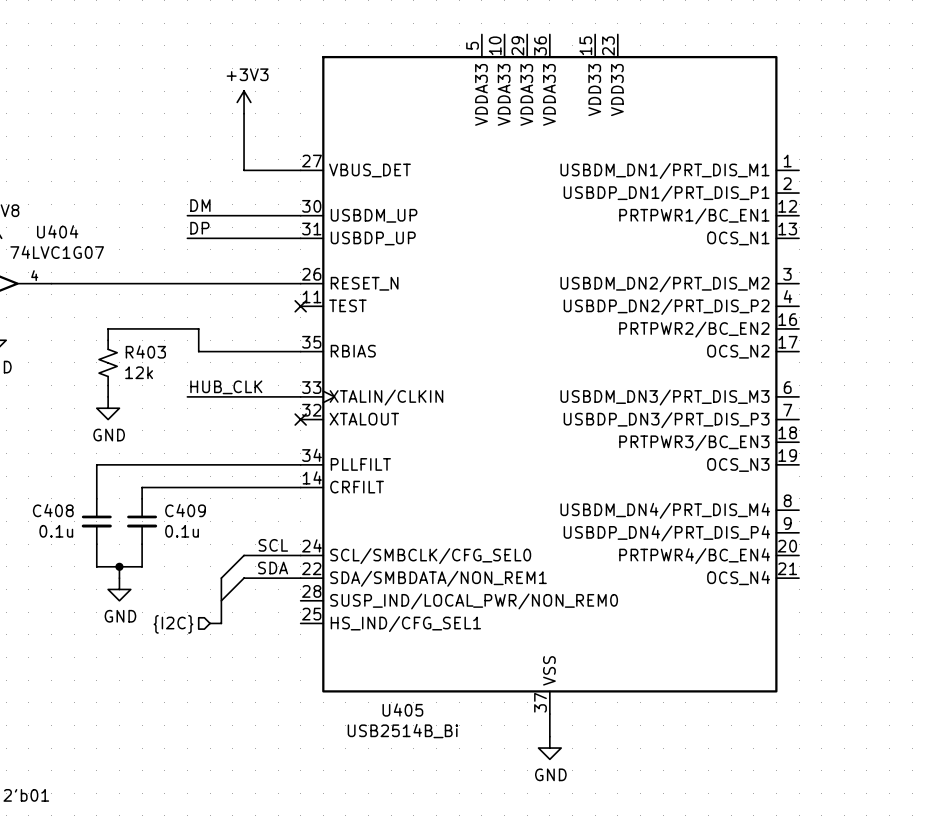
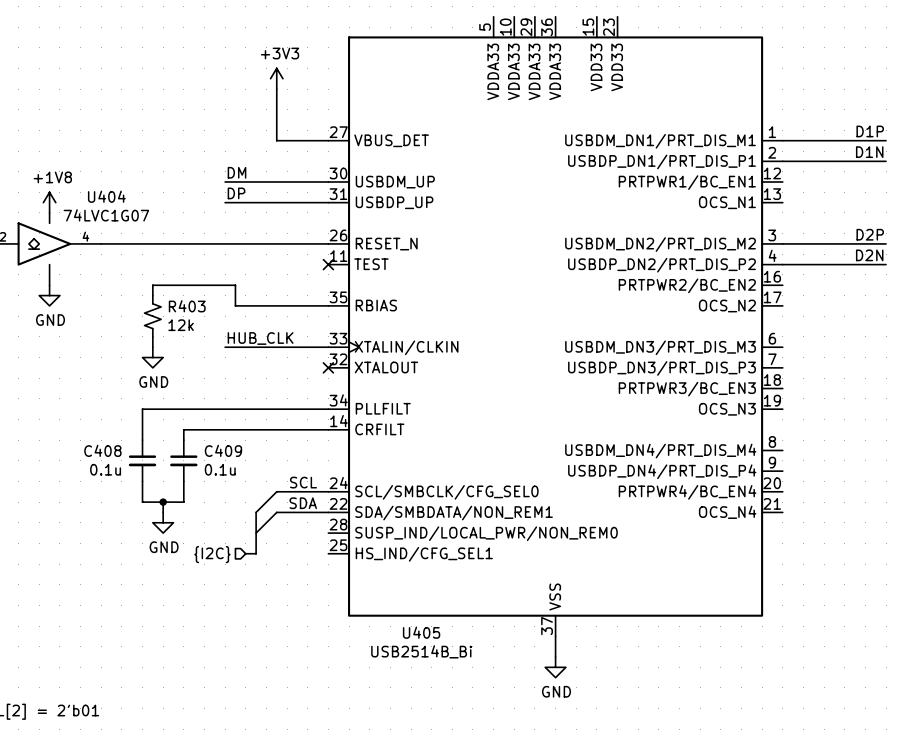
label: none -> D1P (870, 131)
wire: none -> (782, 140) (886, 140)
label: none -> D1N (869, 152)
wire: none -> (782, 161) (886, 161)
label: none -> D2P (870, 234)
wire: none -> (782, 243) (886, 243)
label: none -> D2N (869, 255)
wire: none -> (782, 264) (886, 264)

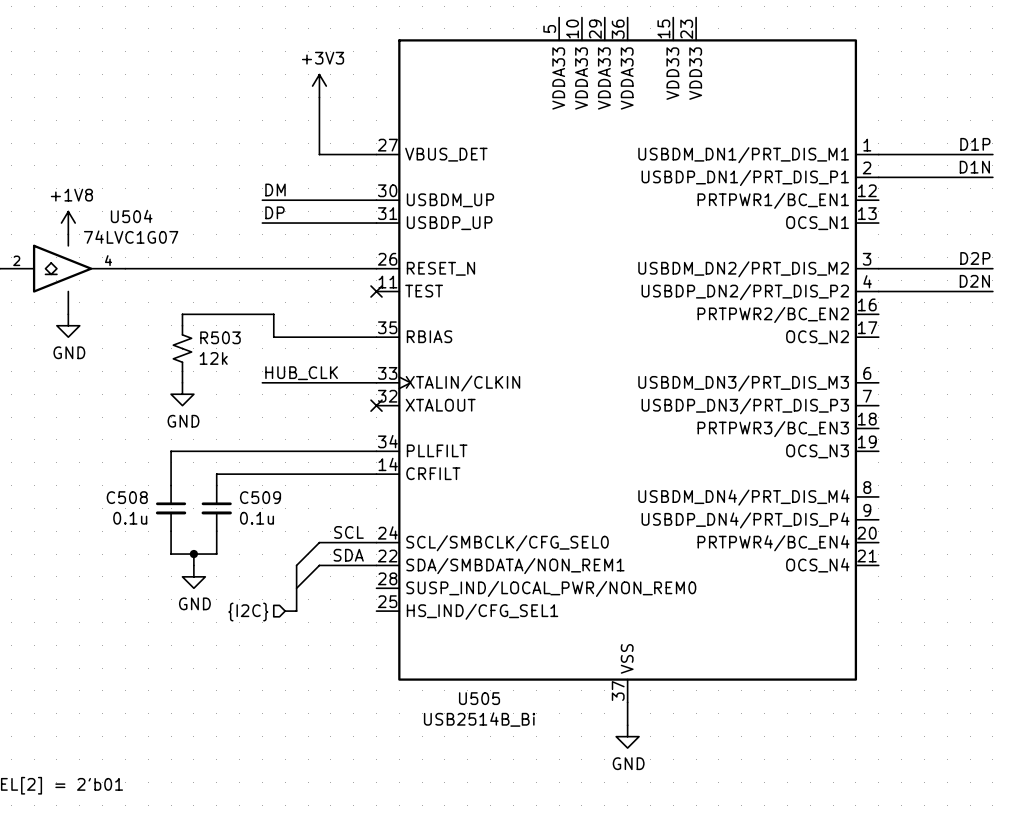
U404 name: U404 (106, 196) -> U504 (131, 216)
R403 name: R403 (187, 306) -> R503 (220, 337)
C408 name: C408 (102, 450) -> C508 (127, 497)
C409 name: C409 (223, 450) -> C509 (260, 497)
U405 name: U405 (421, 632) -> U505 (479, 698)

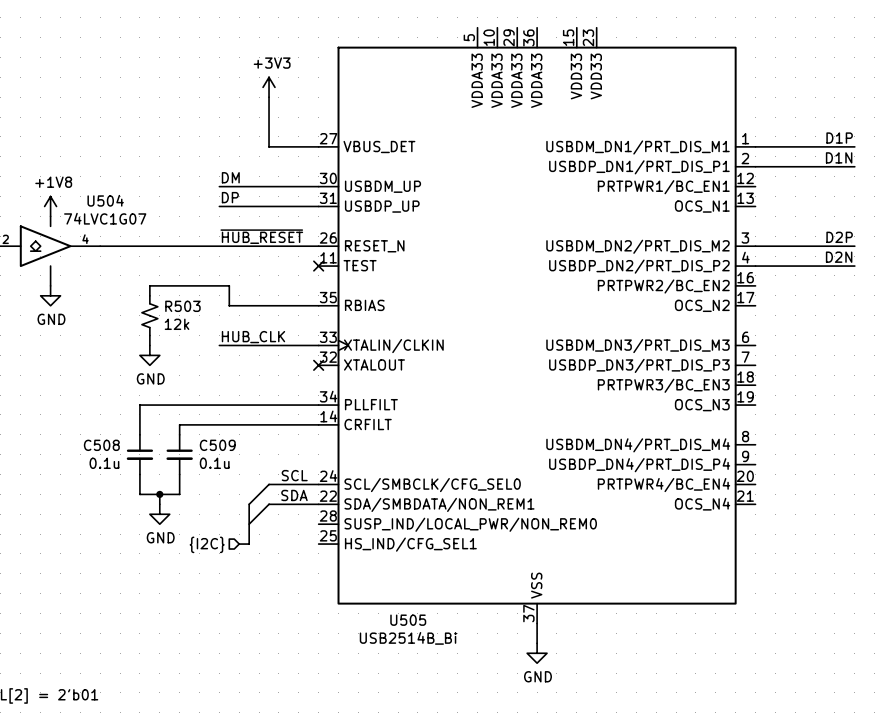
label: none -> ~{HUB_RESET} (261, 236)

